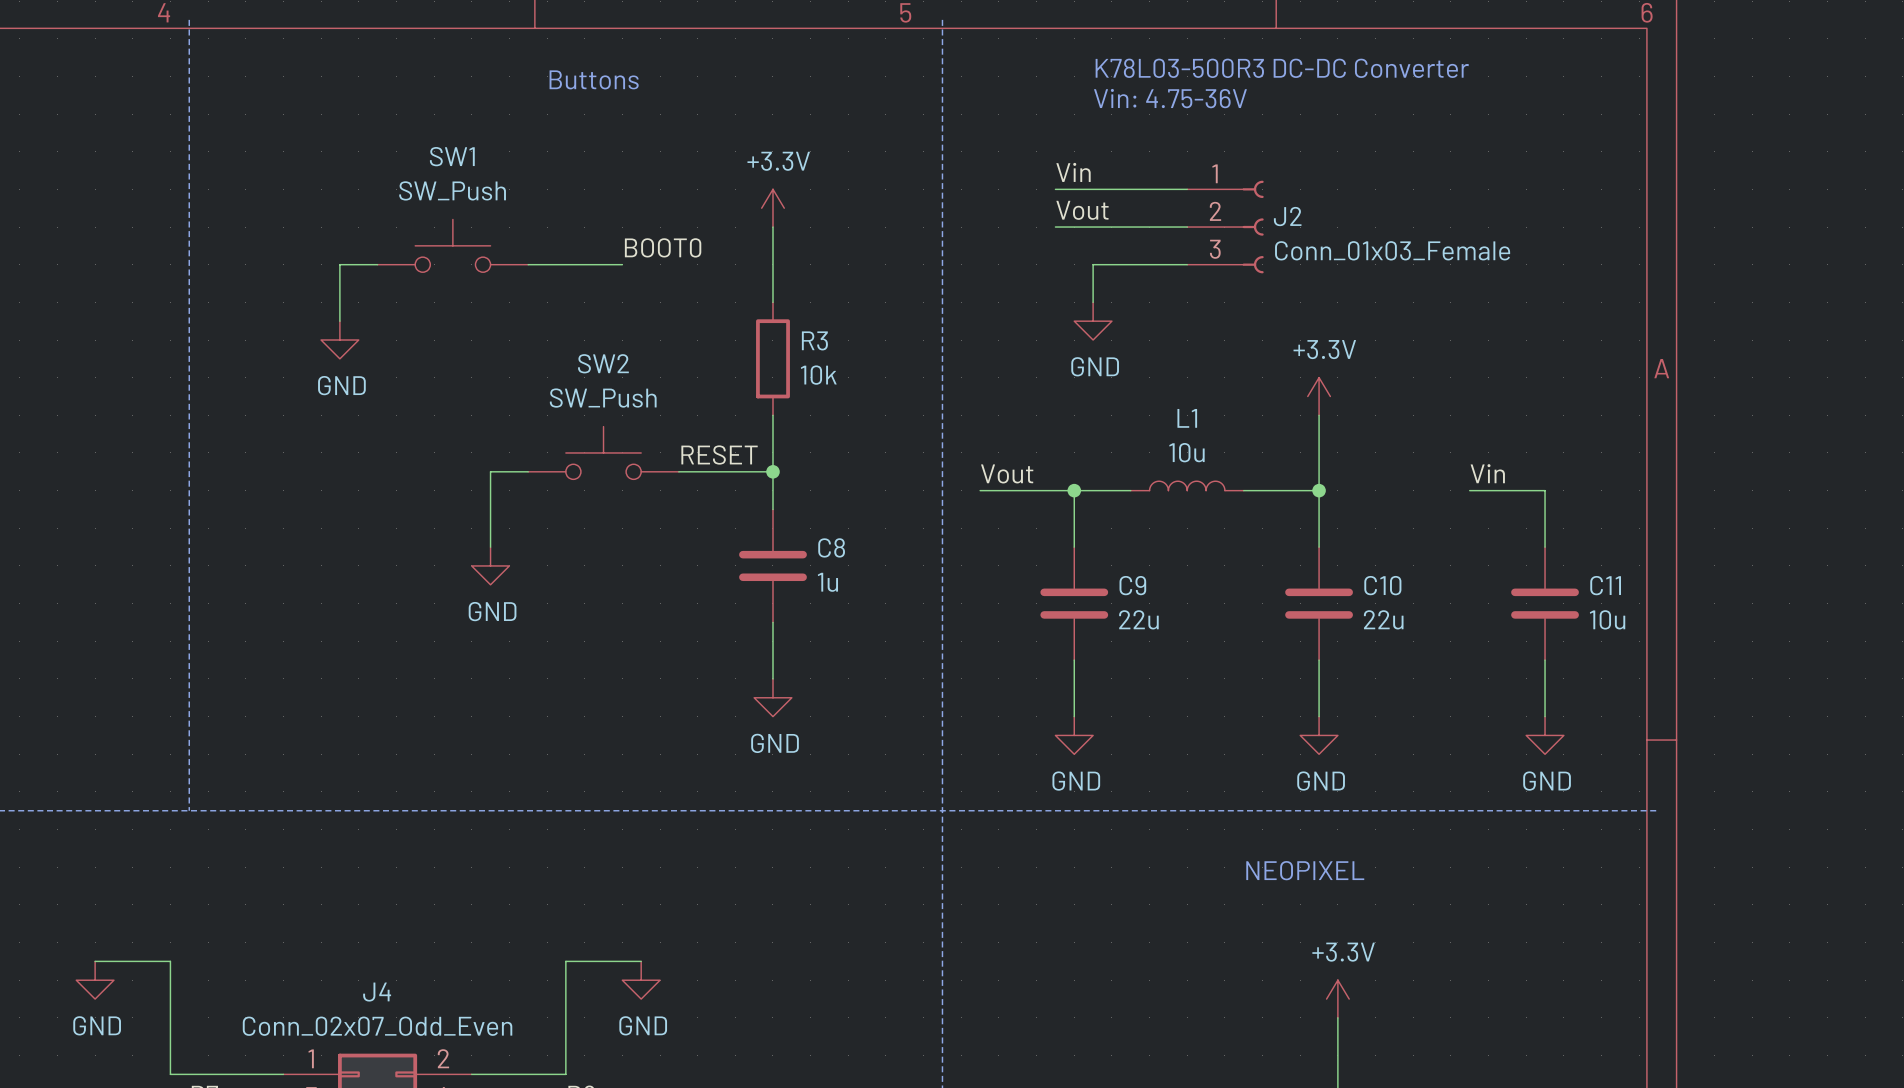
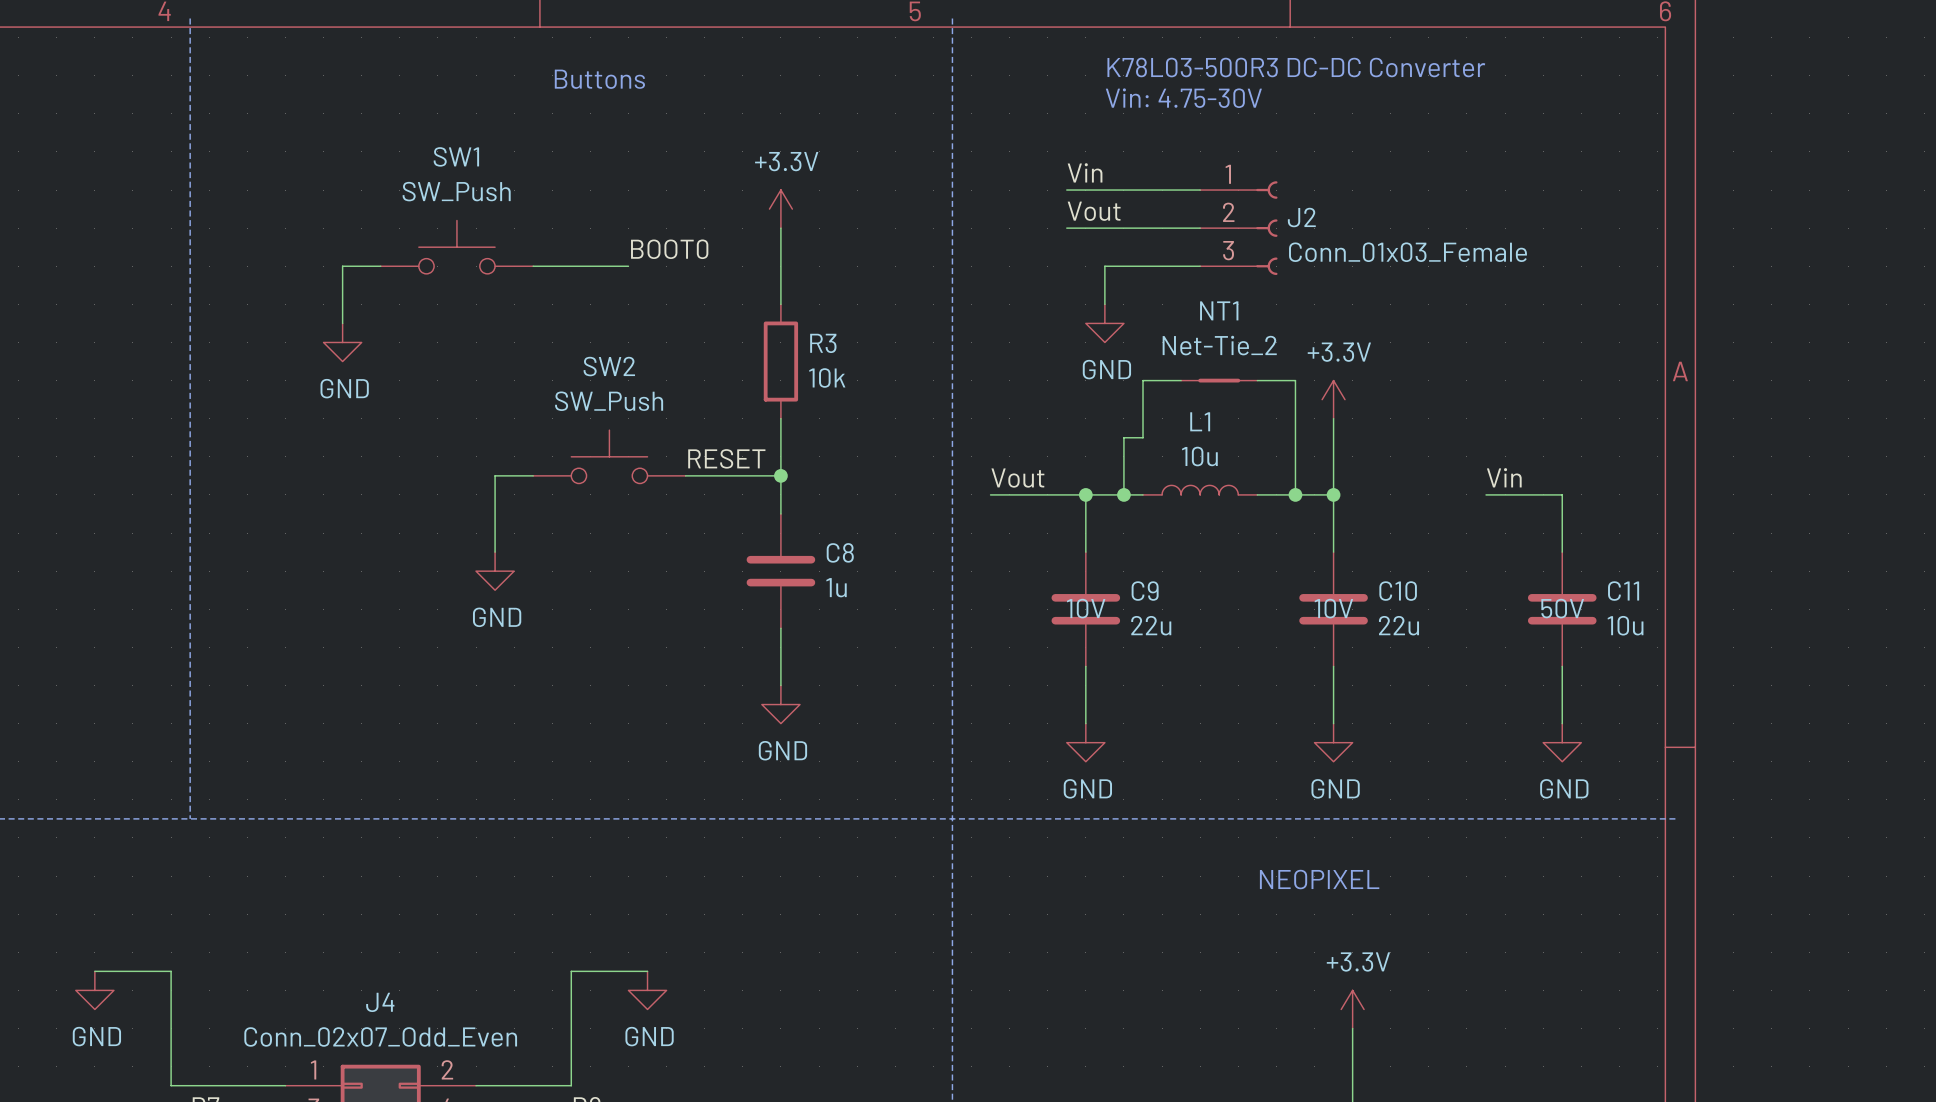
text: Vin: 4.75-36V (1170, 98) -> Vin: 4.75-30V (1183, 98)
wire: none -> (1181, 380) (1143, 380) (1143, 437) (1123, 437) (1123, 494)
NT1: none -> Net-Tie_2 (1219, 380)
wire: none -> (1257, 380) (1295, 380) (1295, 494)
junction: none -> (1123, 494)
junction: none -> (1295, 494)
C9 text: none -> 10V (1086, 608)
C10 text: none -> 10V (1333, 608)
C11 text: none -> 50V (1562, 608)

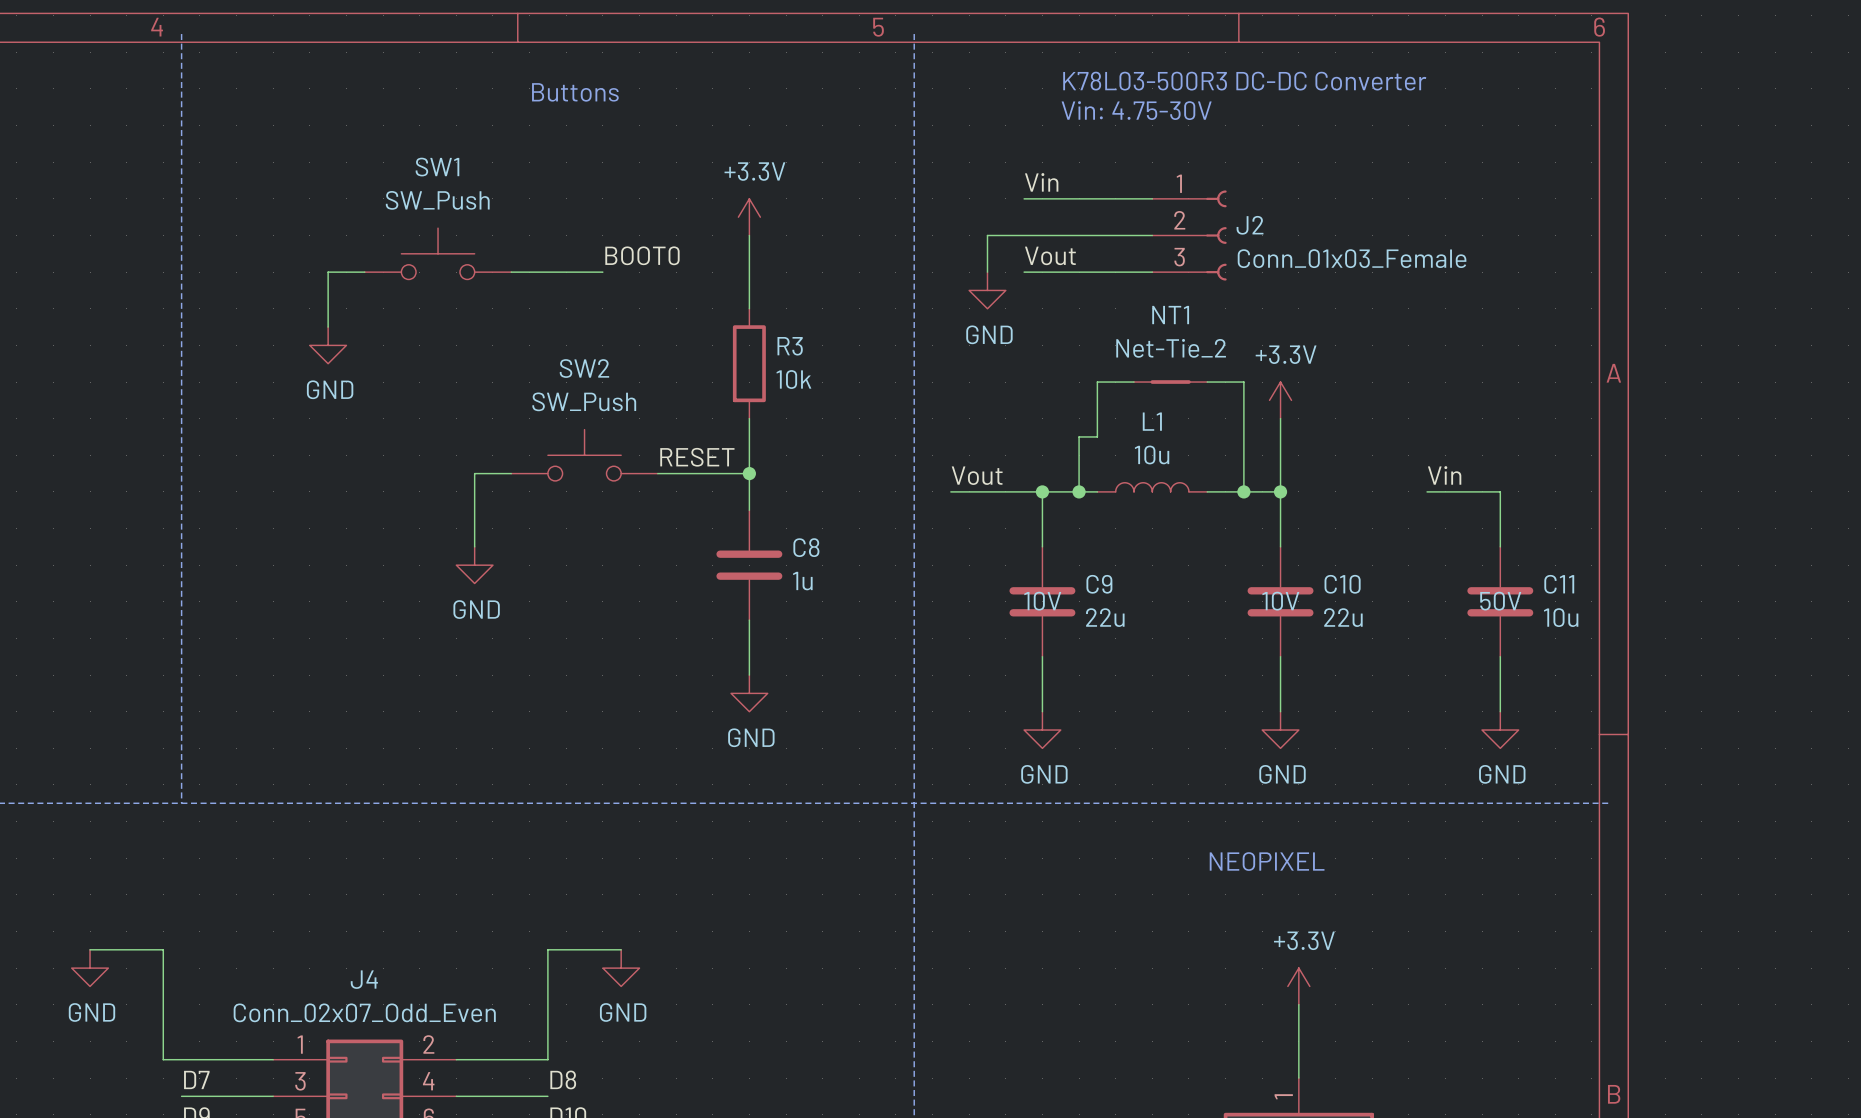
label position: Vout (1094, 211) -> Vout (1050, 255)
wire: none -> (1024, 235) (987, 235) (987, 272)
wire: (1104, 266) (1104, 304) -> (1060, 272) (1024, 272)
power symbol position: GND (1104, 323) -> GND (987, 290)

